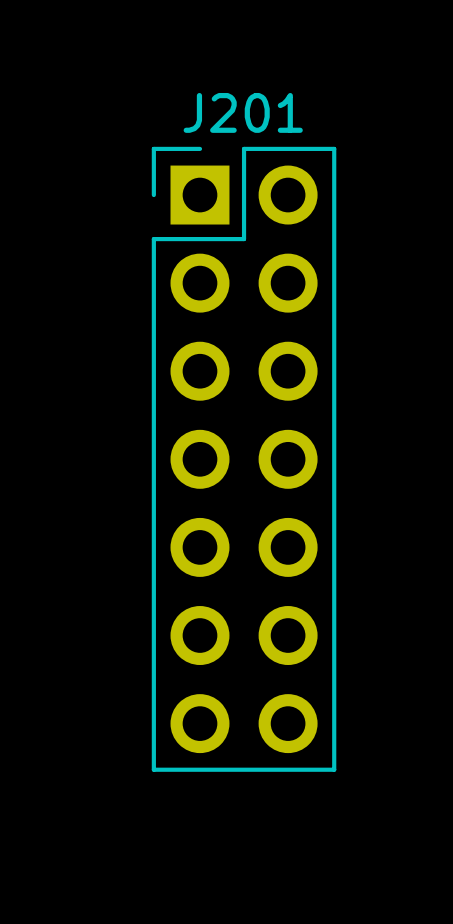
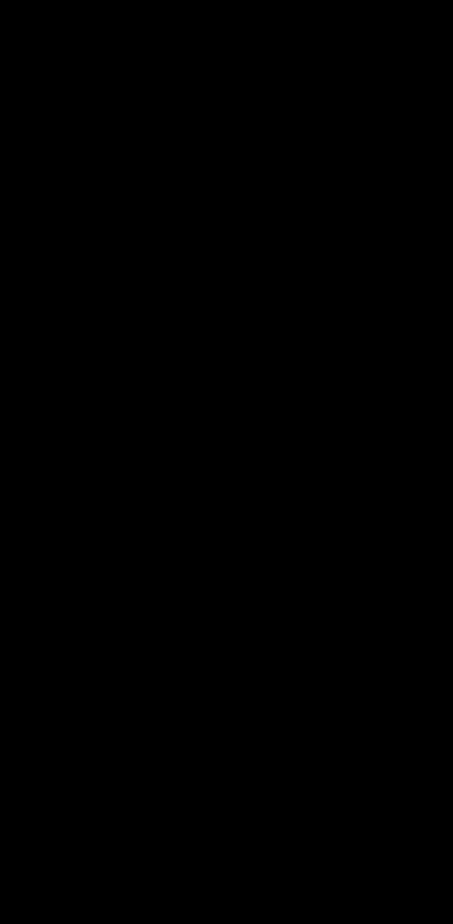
J201: (244, 459) -> none

